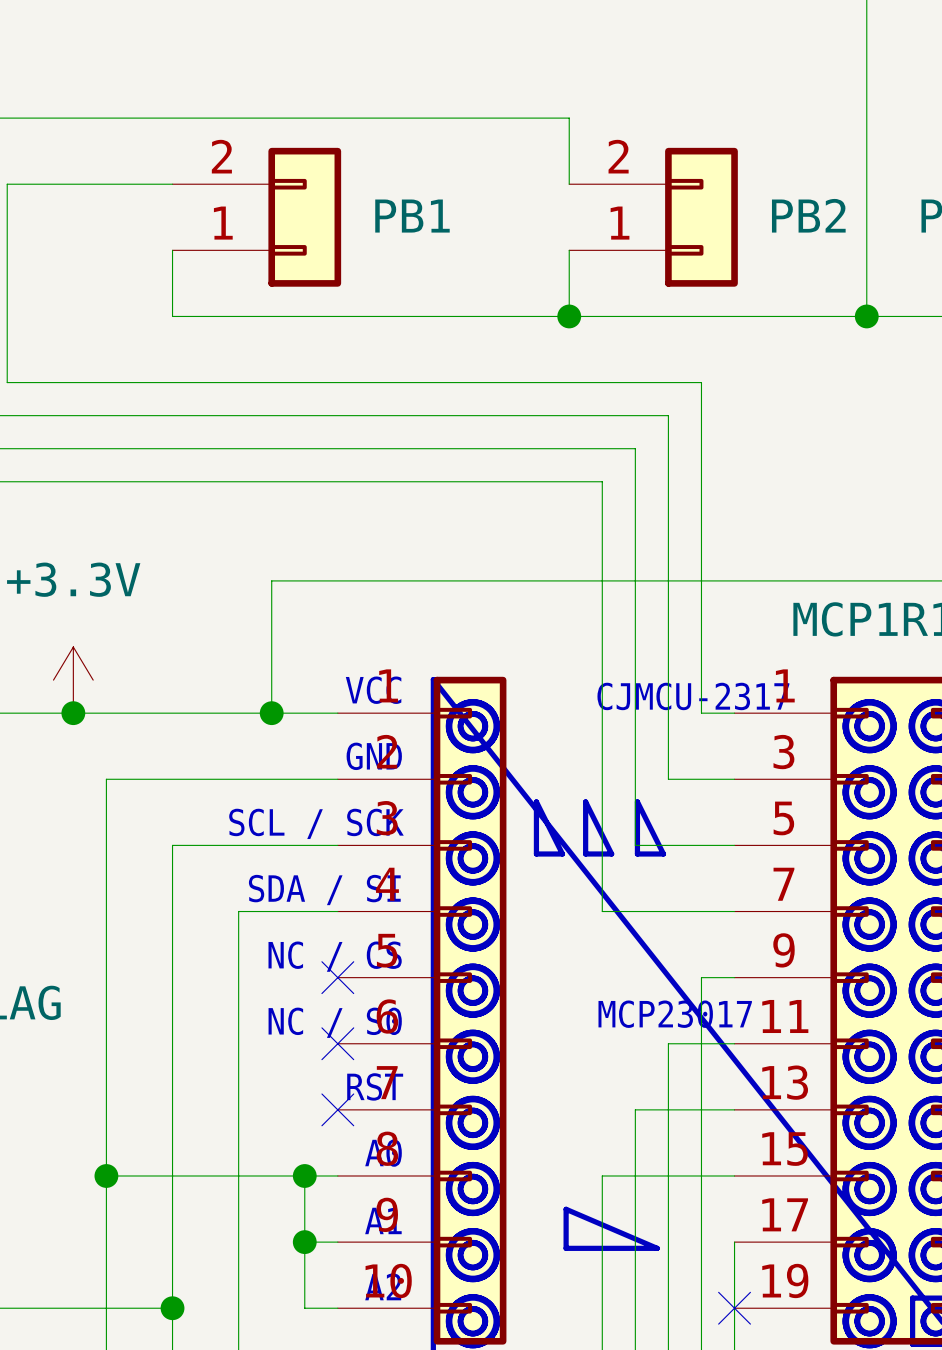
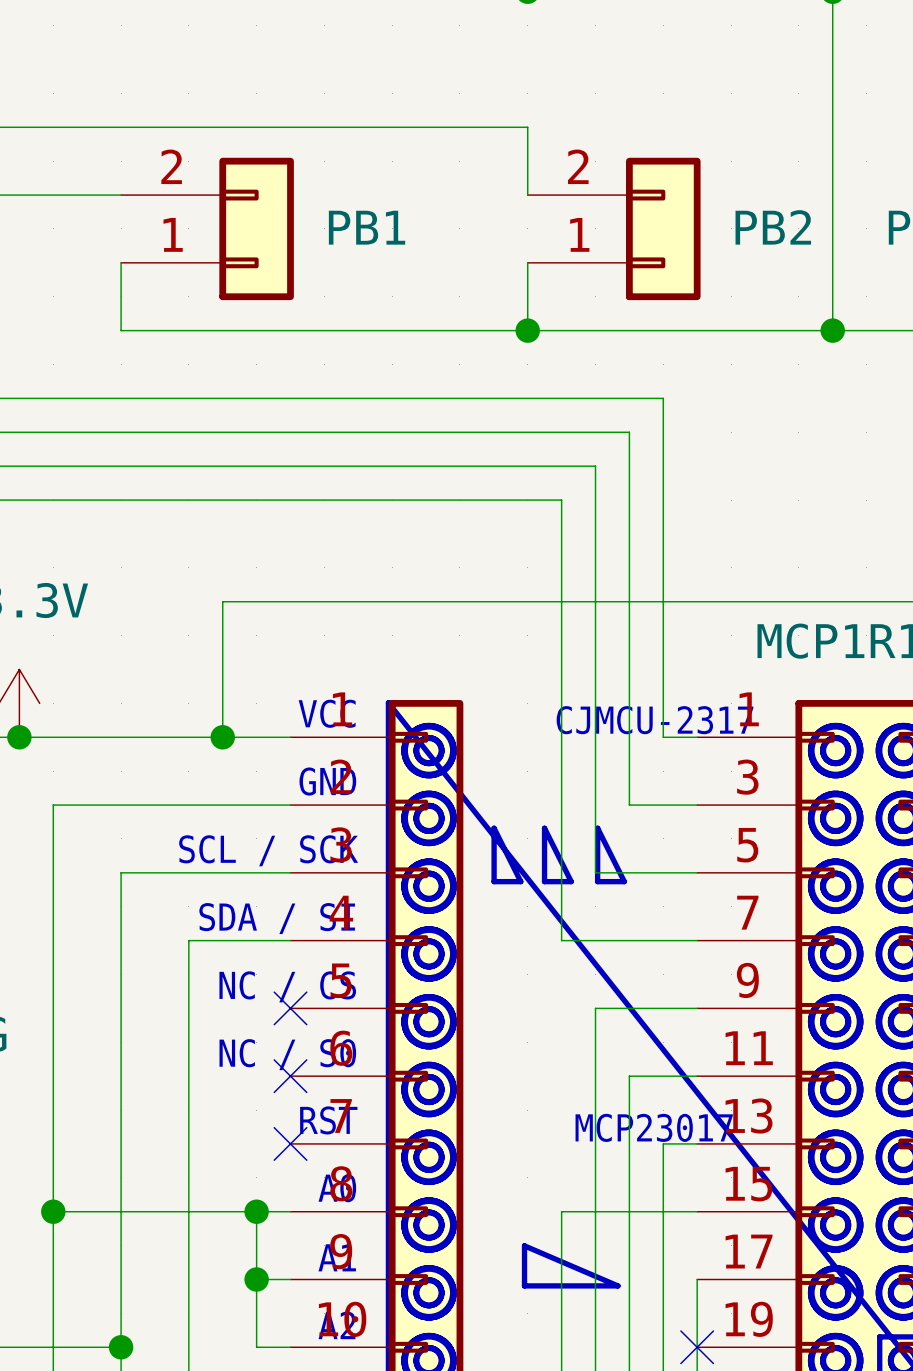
wire: (701, 977) (701, 1109) (635, 1109) -> (663, 1008) (595, 1008) (595, 1143)
text position: MCP23017 (675, 1014) -> MCP23017 (654, 1127)

